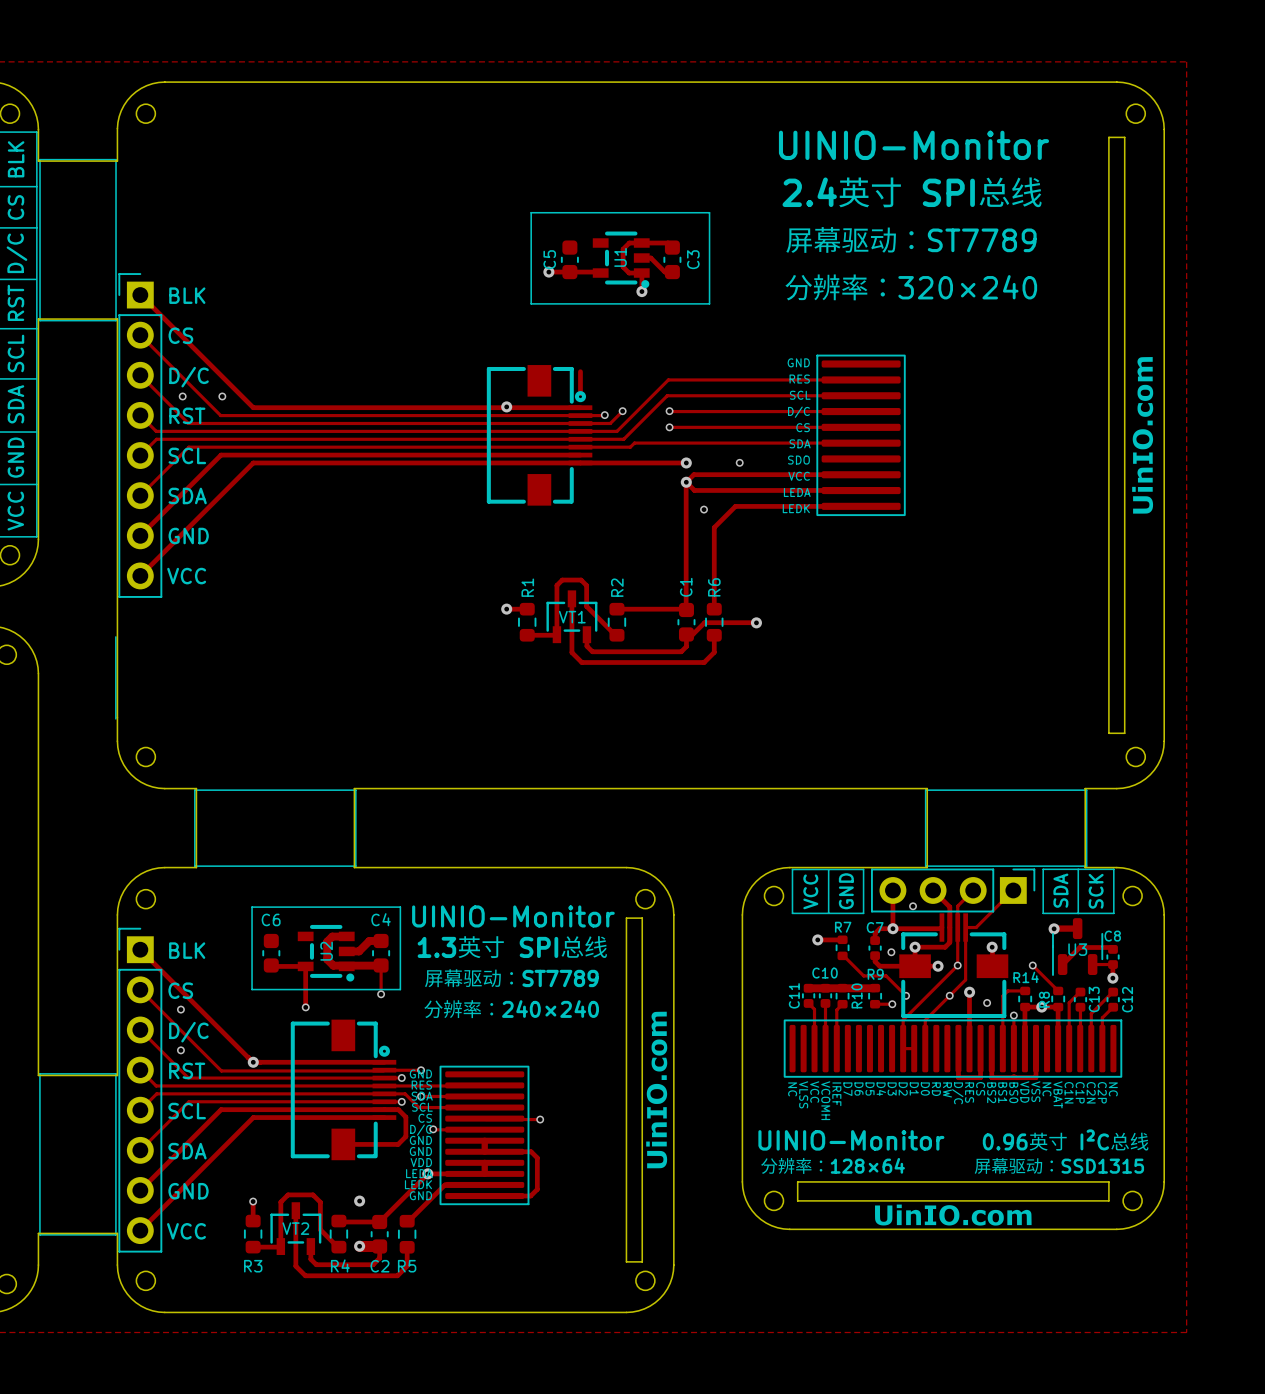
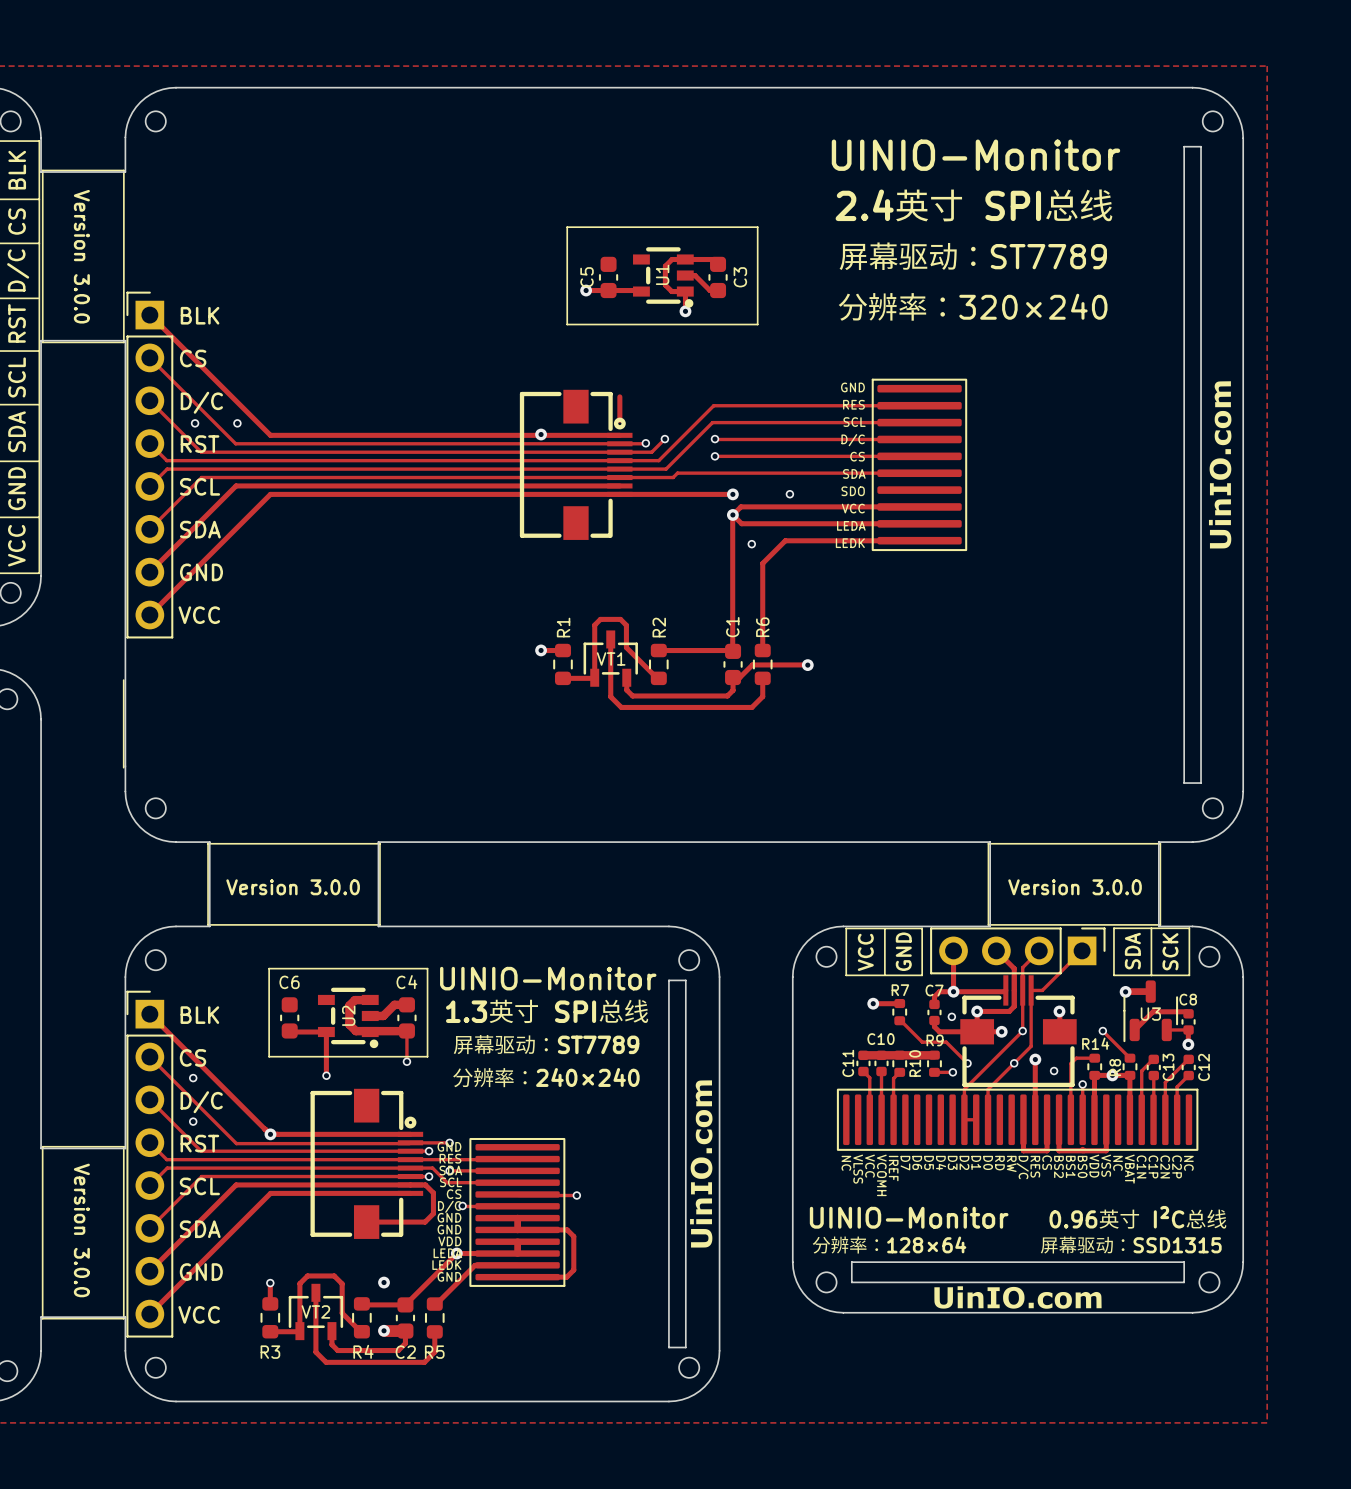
text: none -> Version 3.0.0 (81, 256)
text: none -> Version 3.0.0 (293, 887)
text: none -> Version 3.0.0 (1075, 887)
via: (913, 906) -> none
text: none -> Version 3.0.0 (81, 1230)

